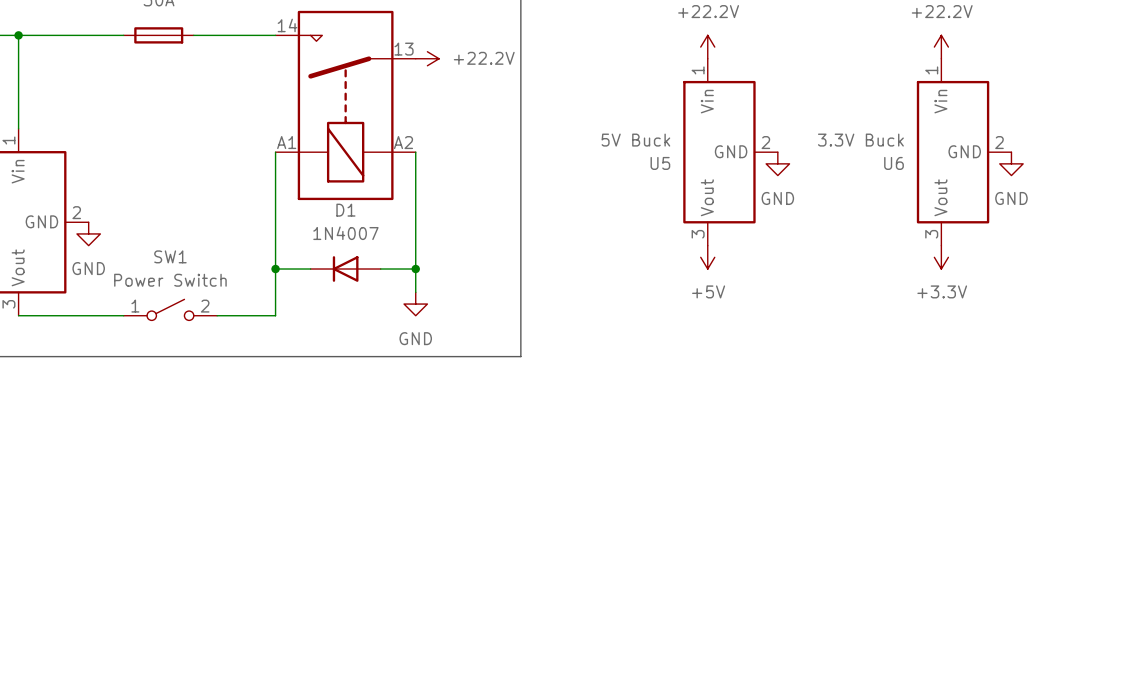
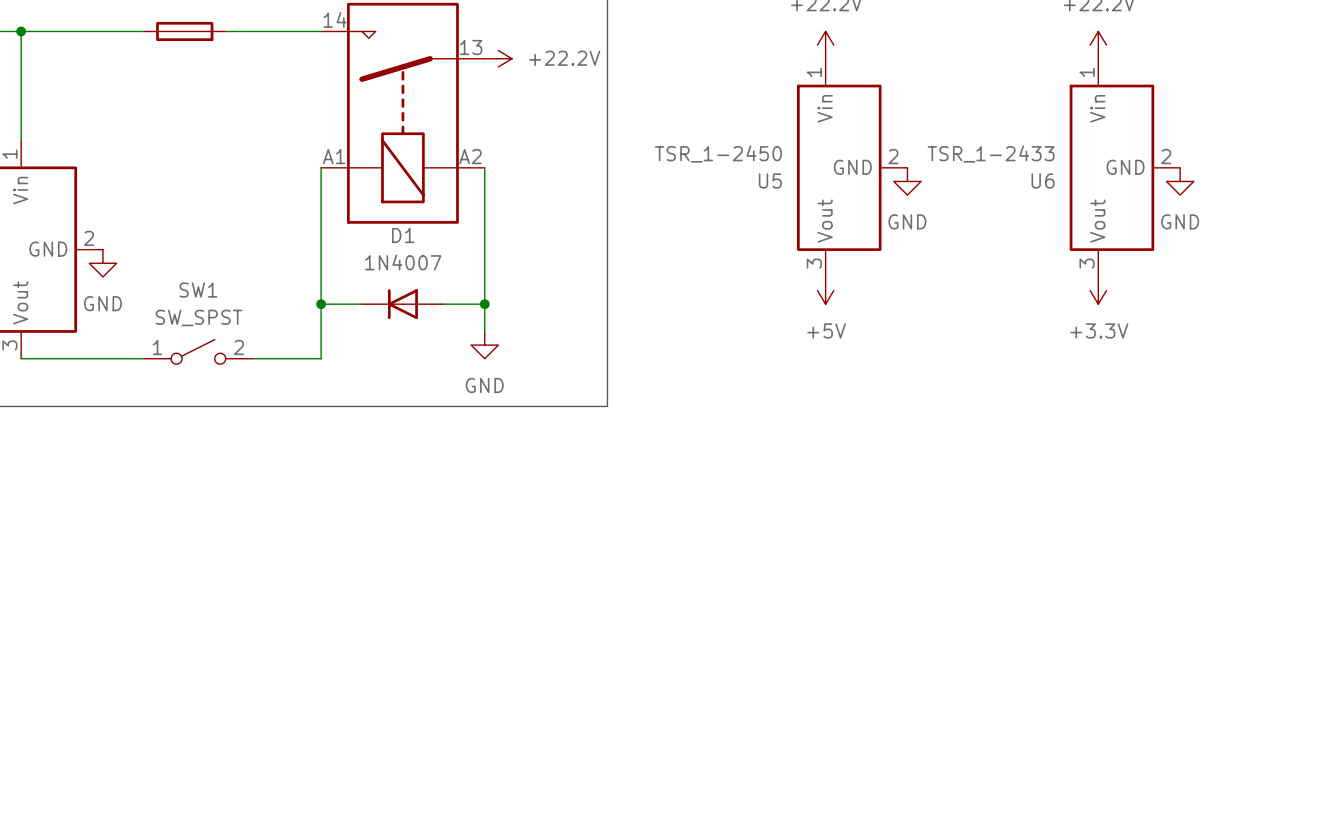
U5 value: 5V Buck (635, 140) -> TSR_1-2450 (718, 154)
U6 value: 3.3V Buck (860, 140) -> TSR_1-2433 (991, 154)
SW1 value: Power Switch (170, 280) -> SW_SPST (199, 317)

